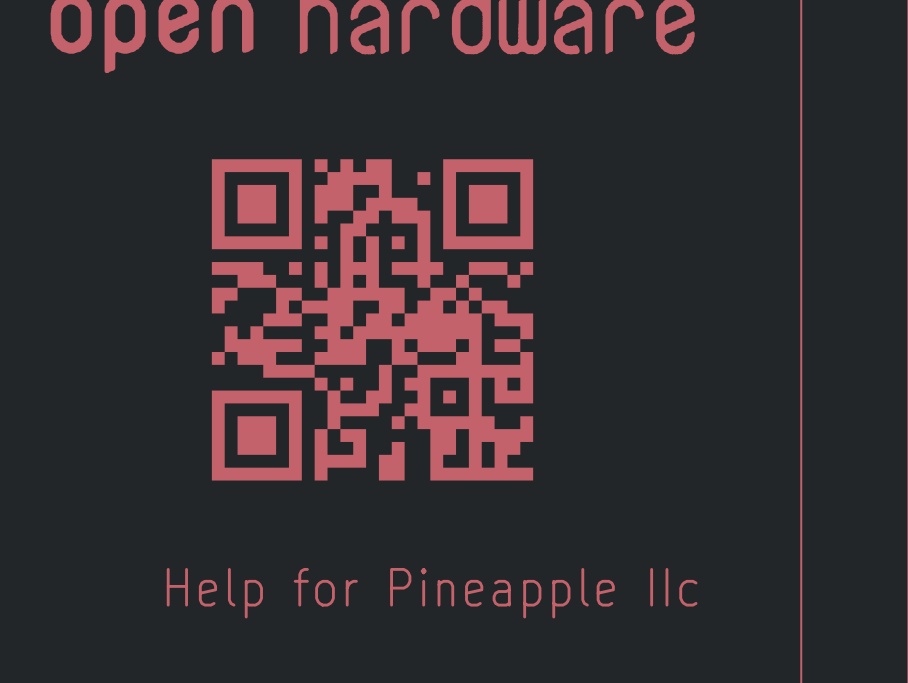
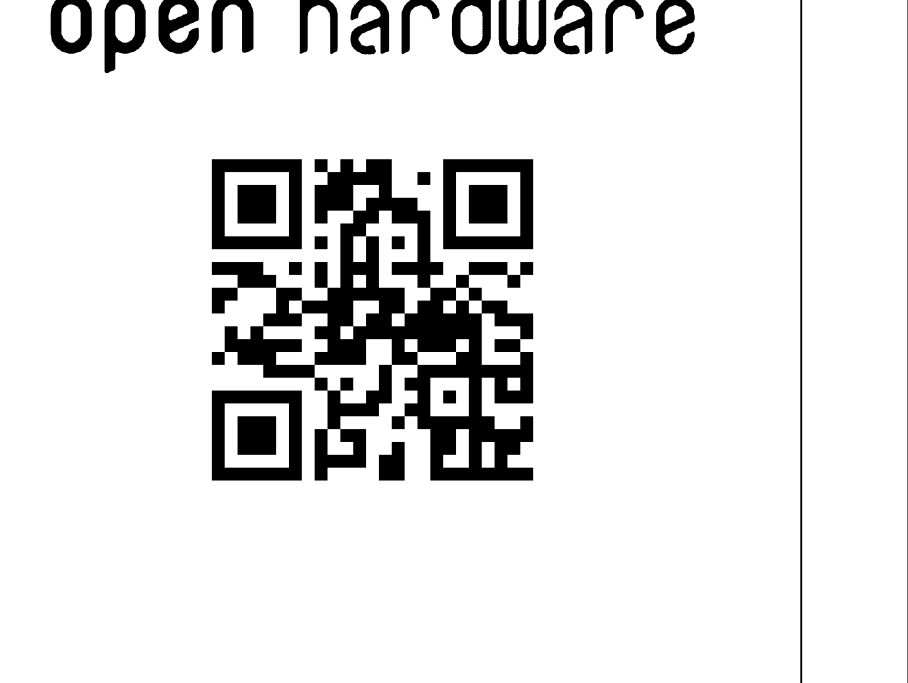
part: (432, 593) -> none

